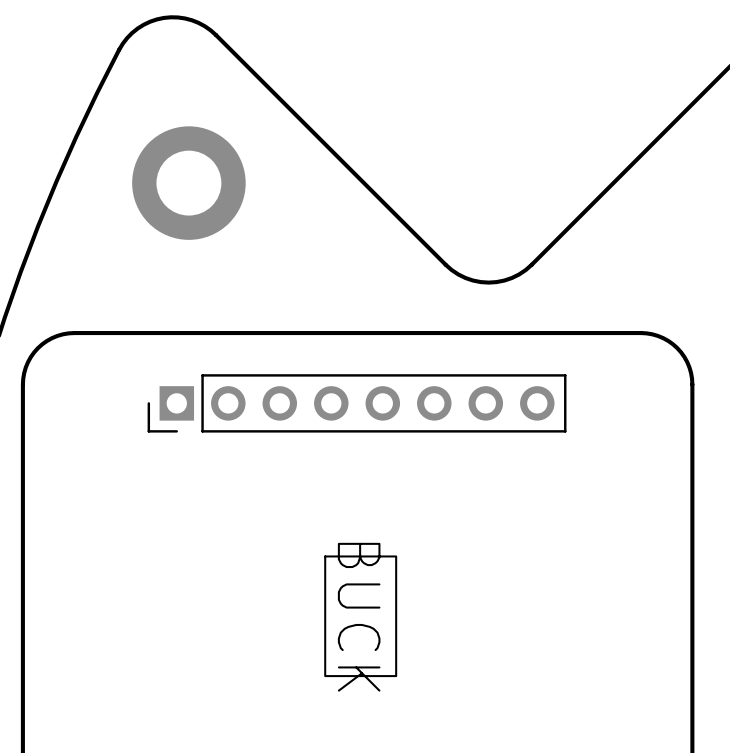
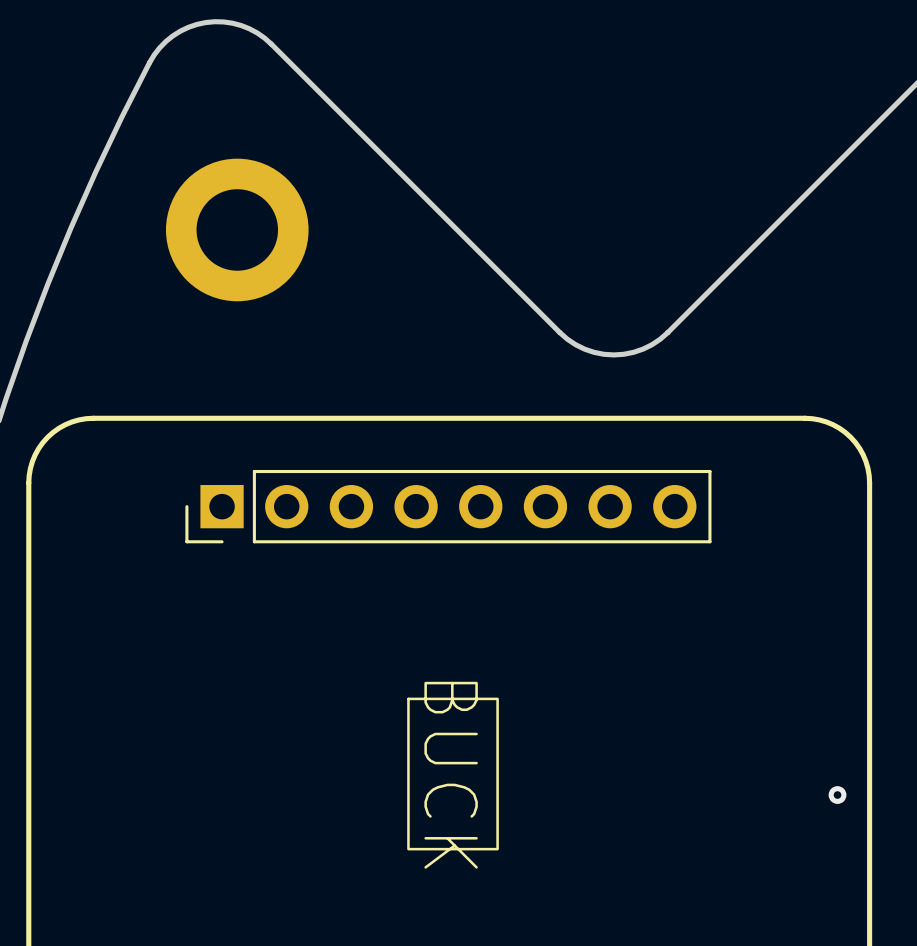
via: none -> (837, 795)

